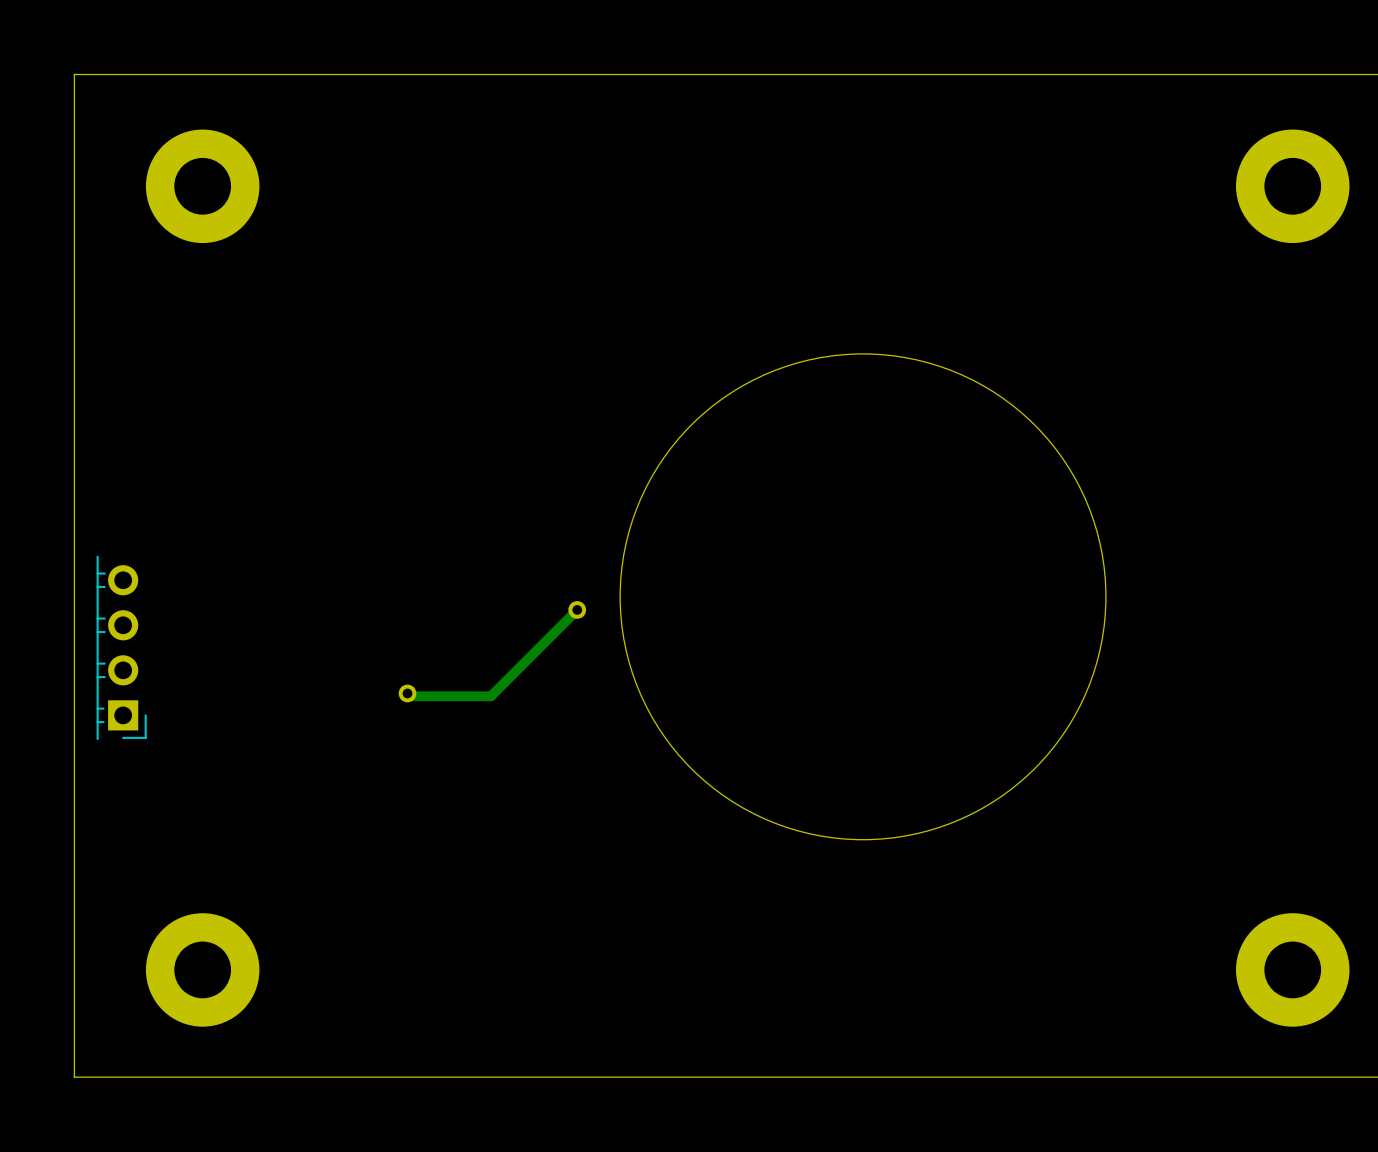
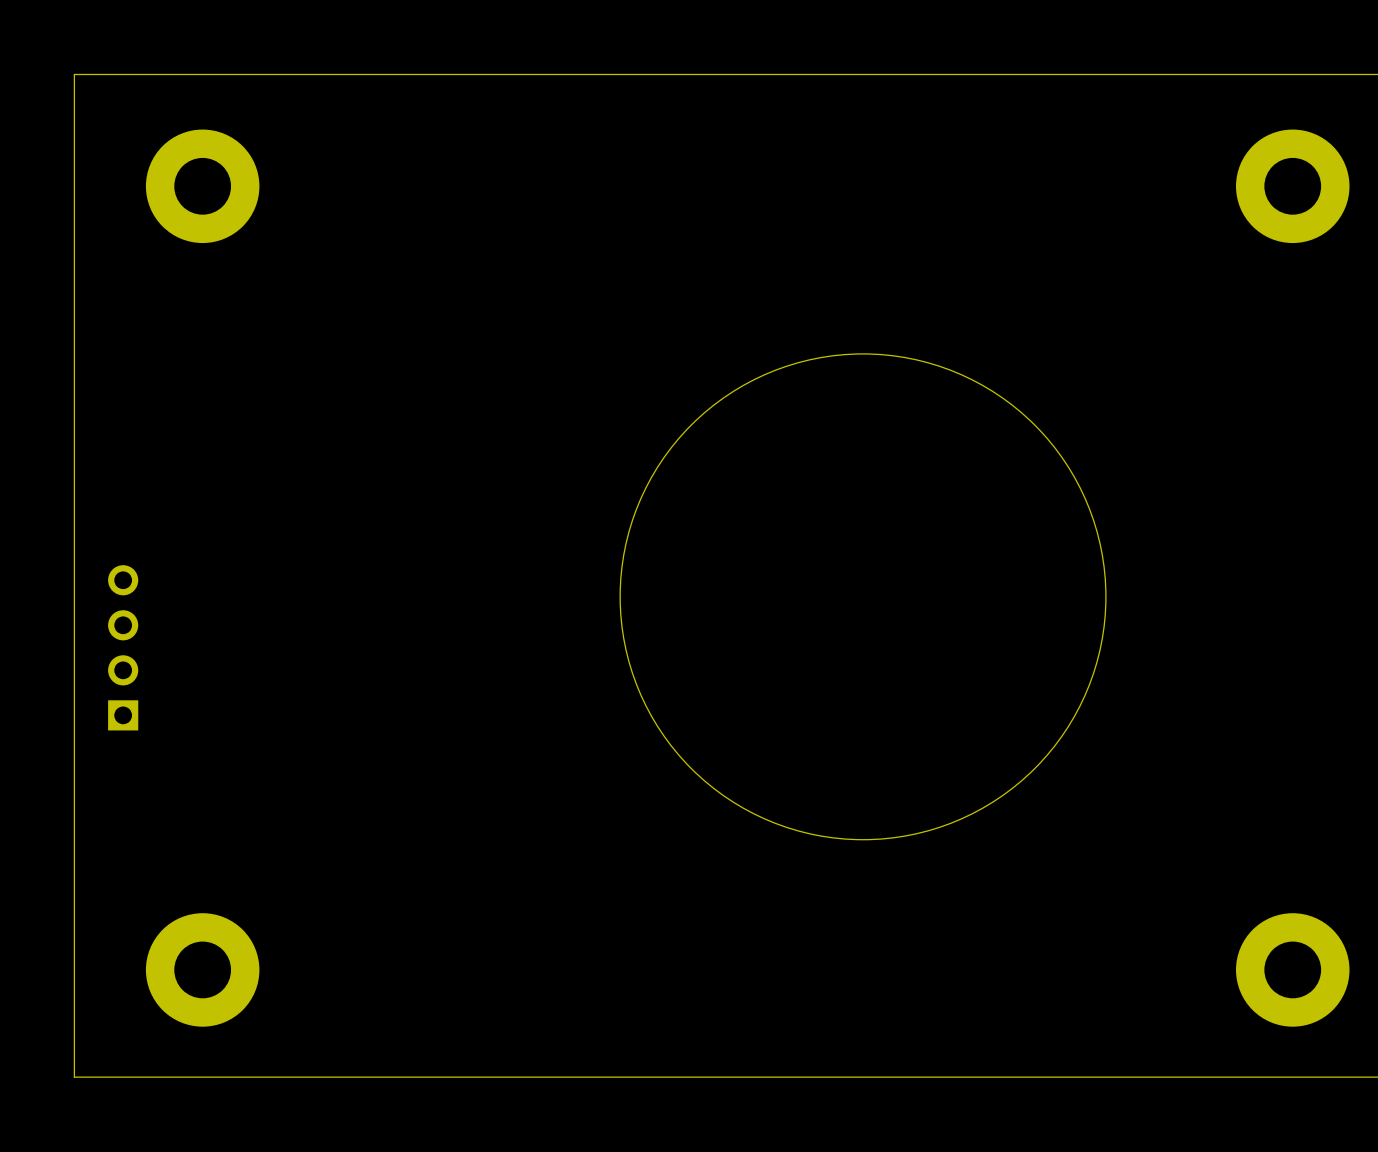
part side: bottom (121, 647) -> top (123, 647)
part: (492, 651) -> none

